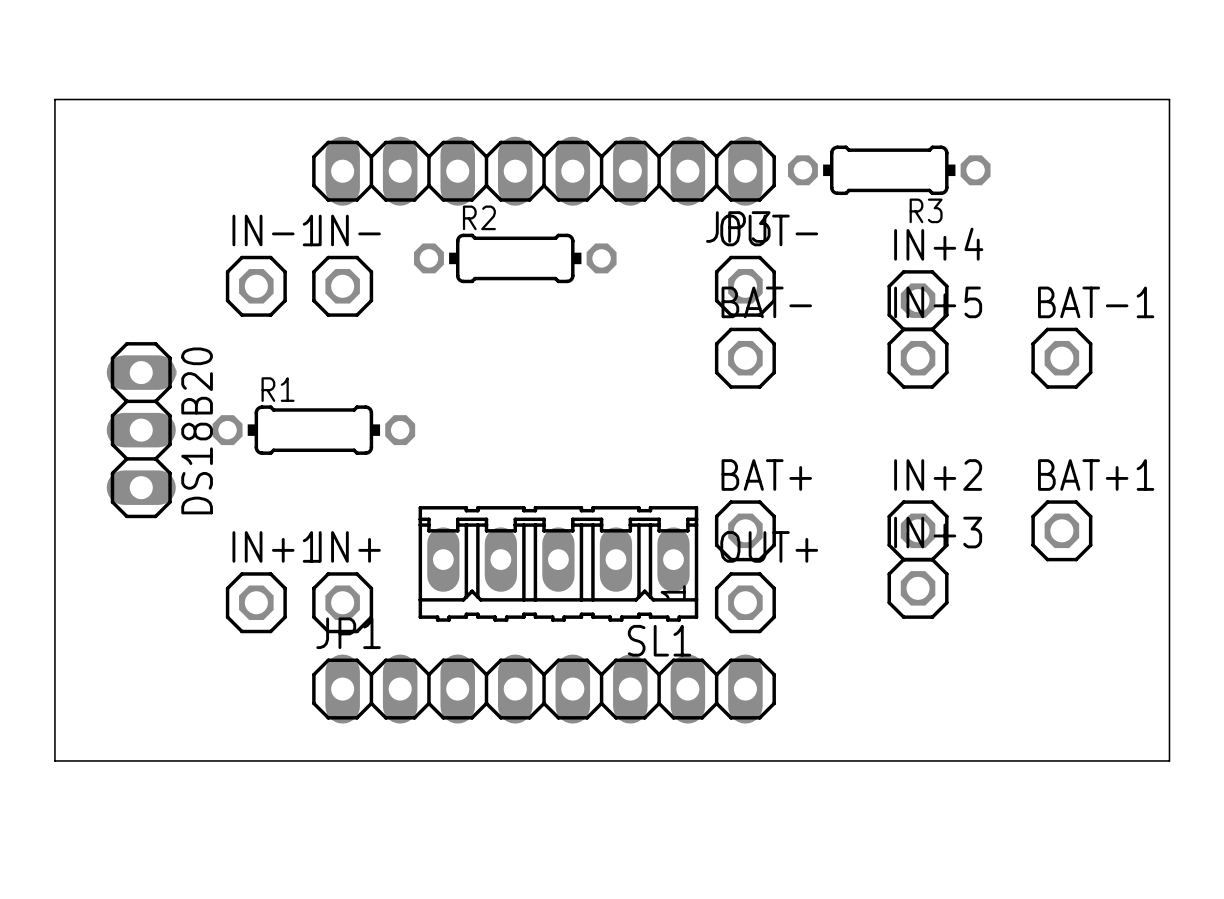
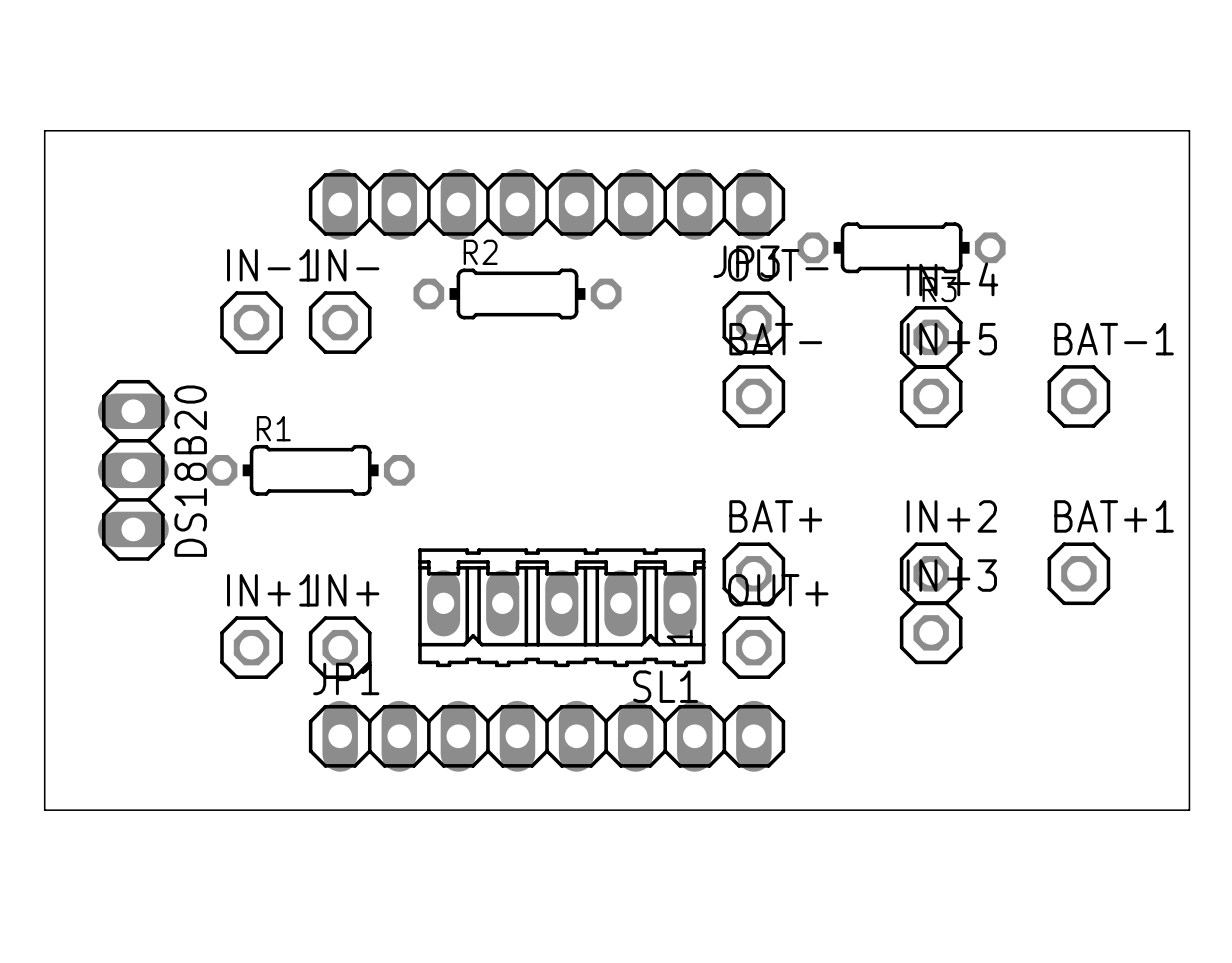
R3 position: (889, 170) -> (901, 247)

